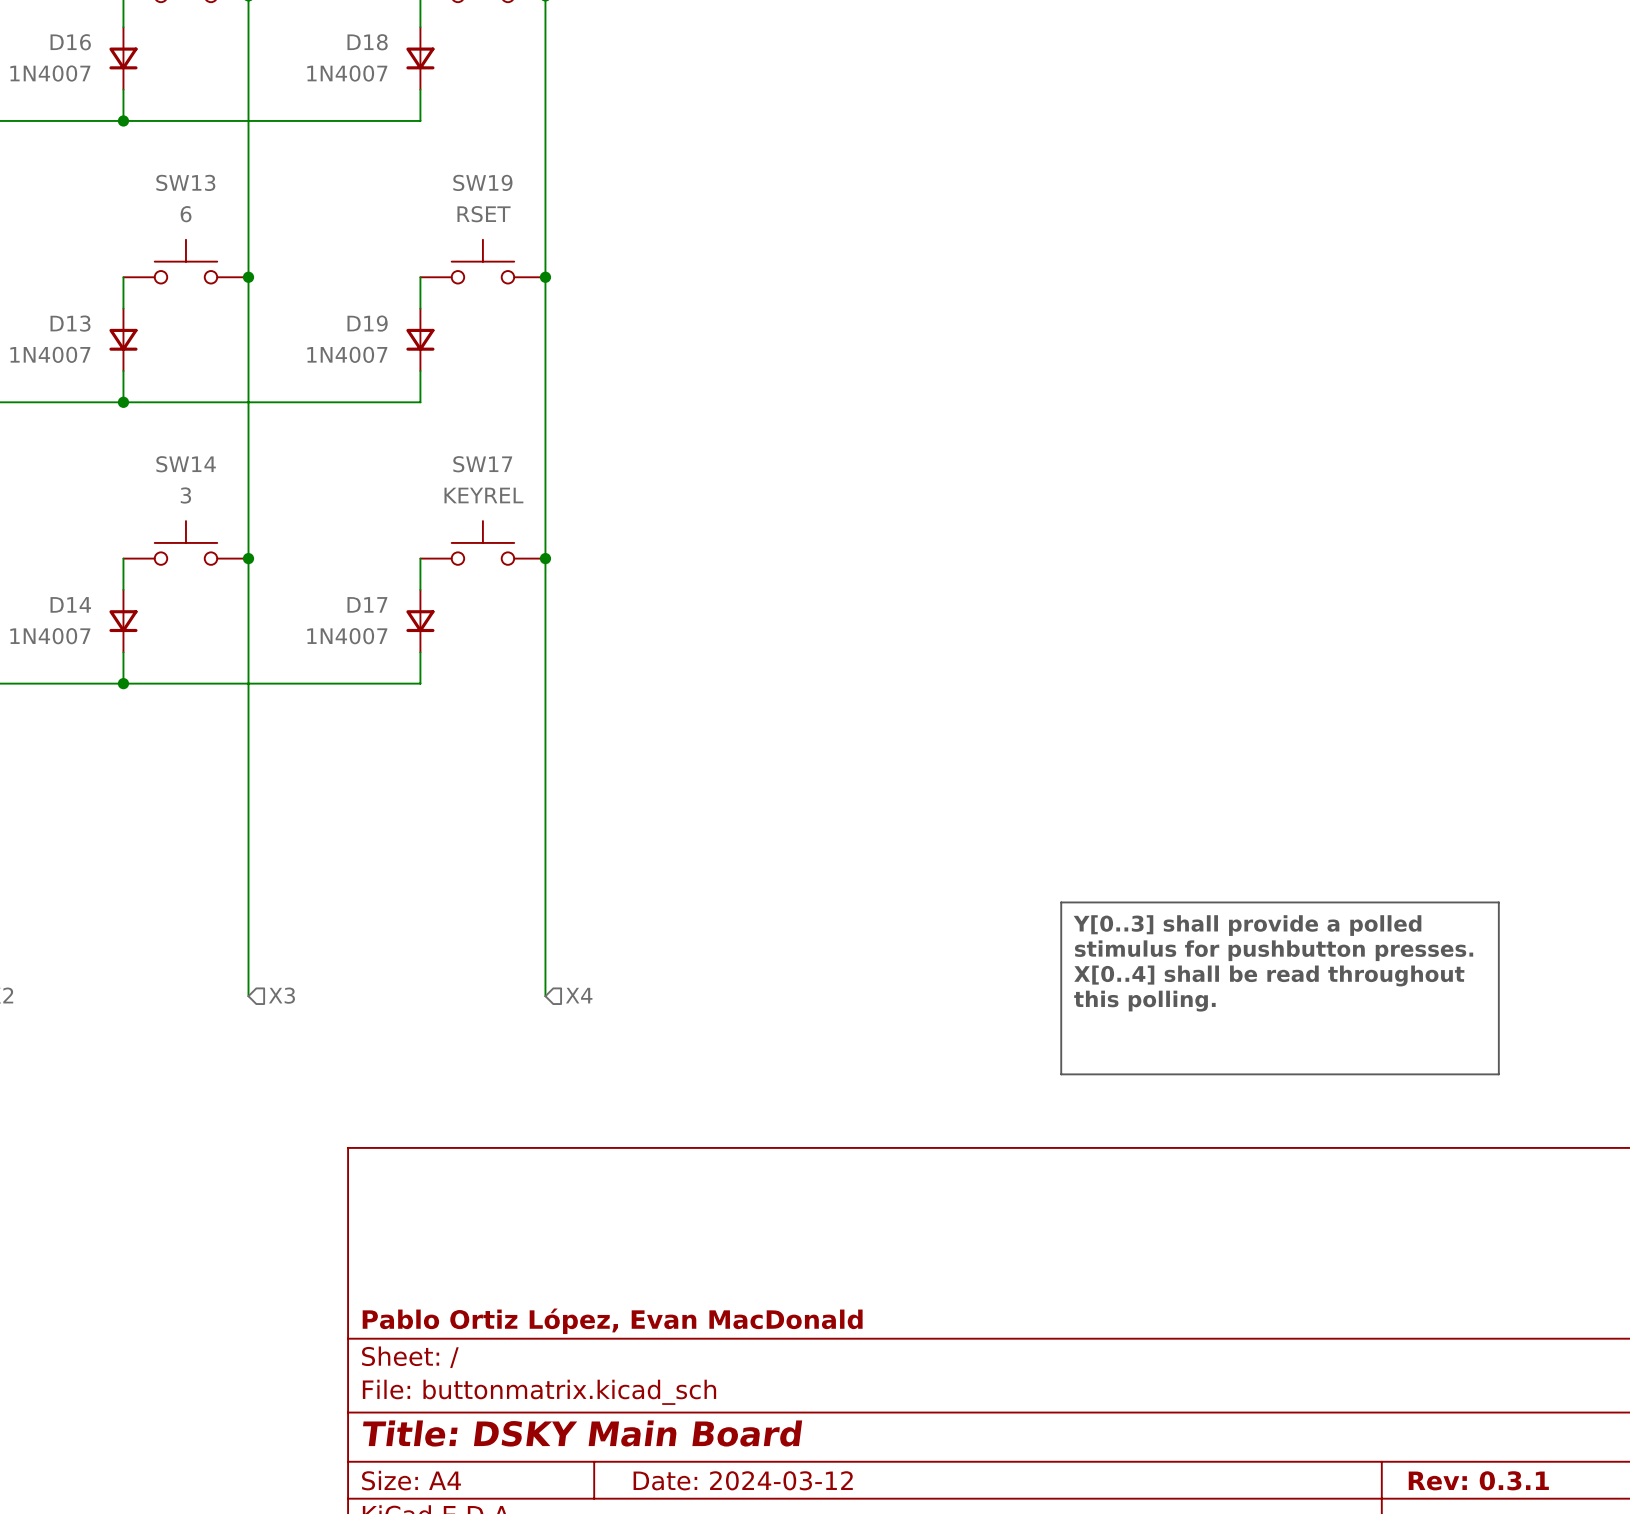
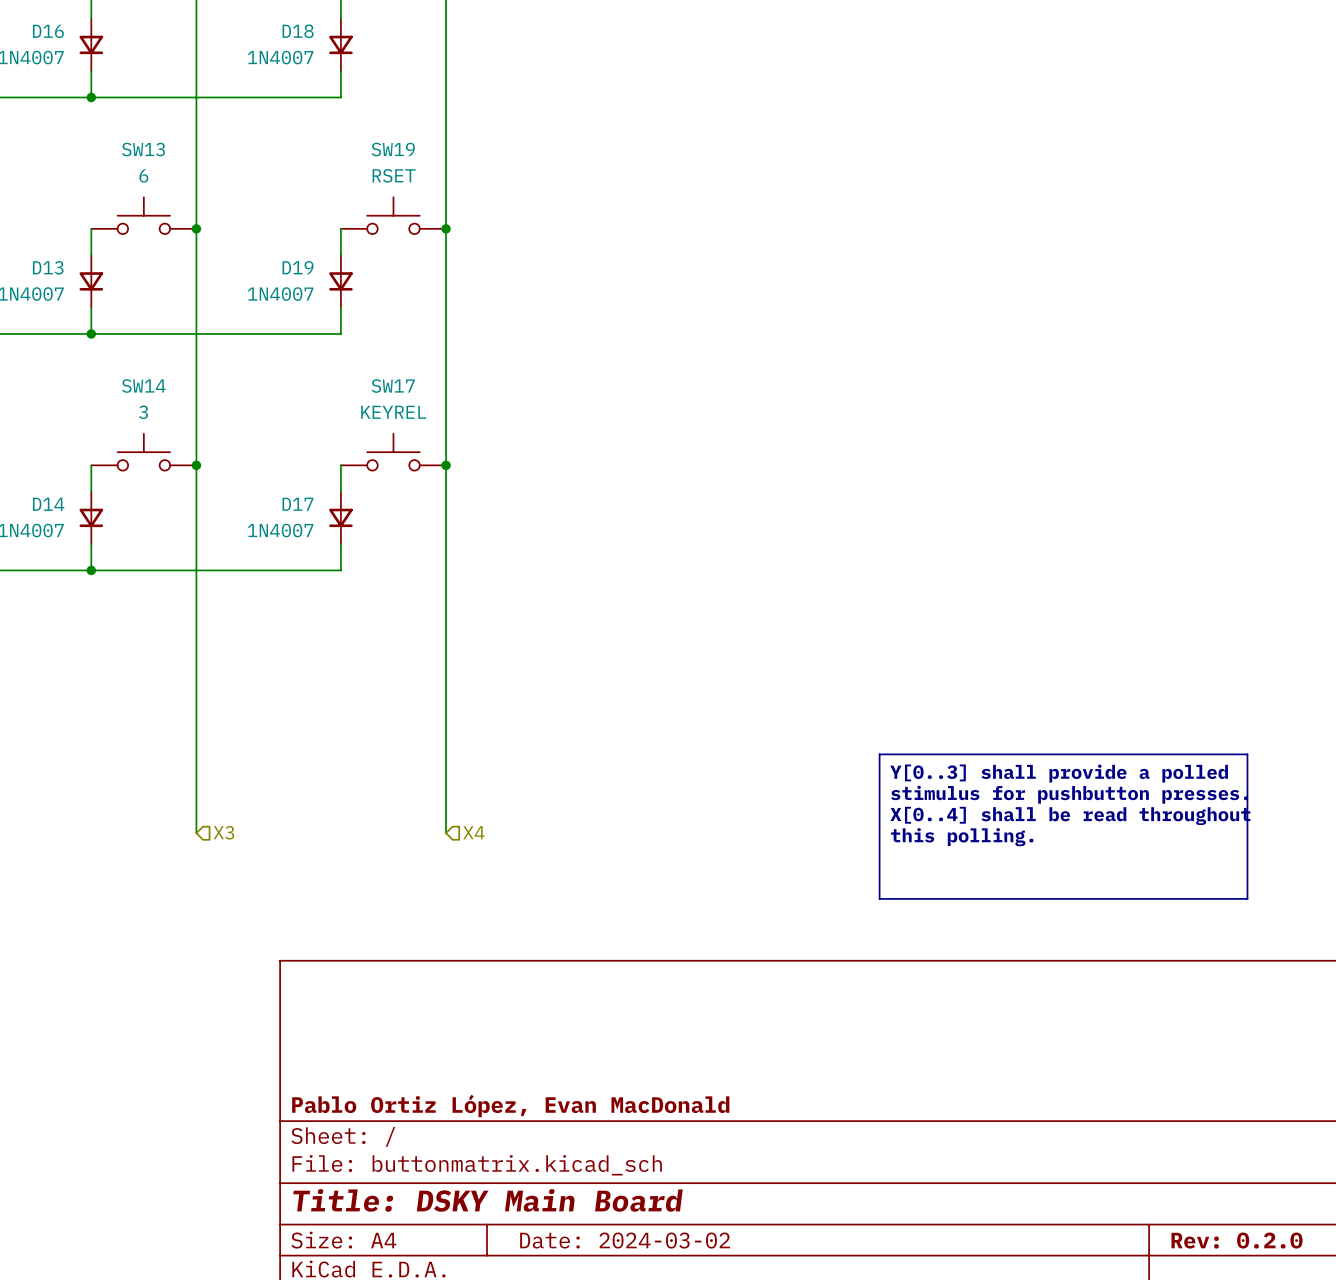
title block: Date: 2024-03-12 (743, 1480) -> Date: 2024-03-02 (625, 1240)
title block: Rev: 0.3.1 (1478, 1480) -> Rev: 0.2.0 (1237, 1240)

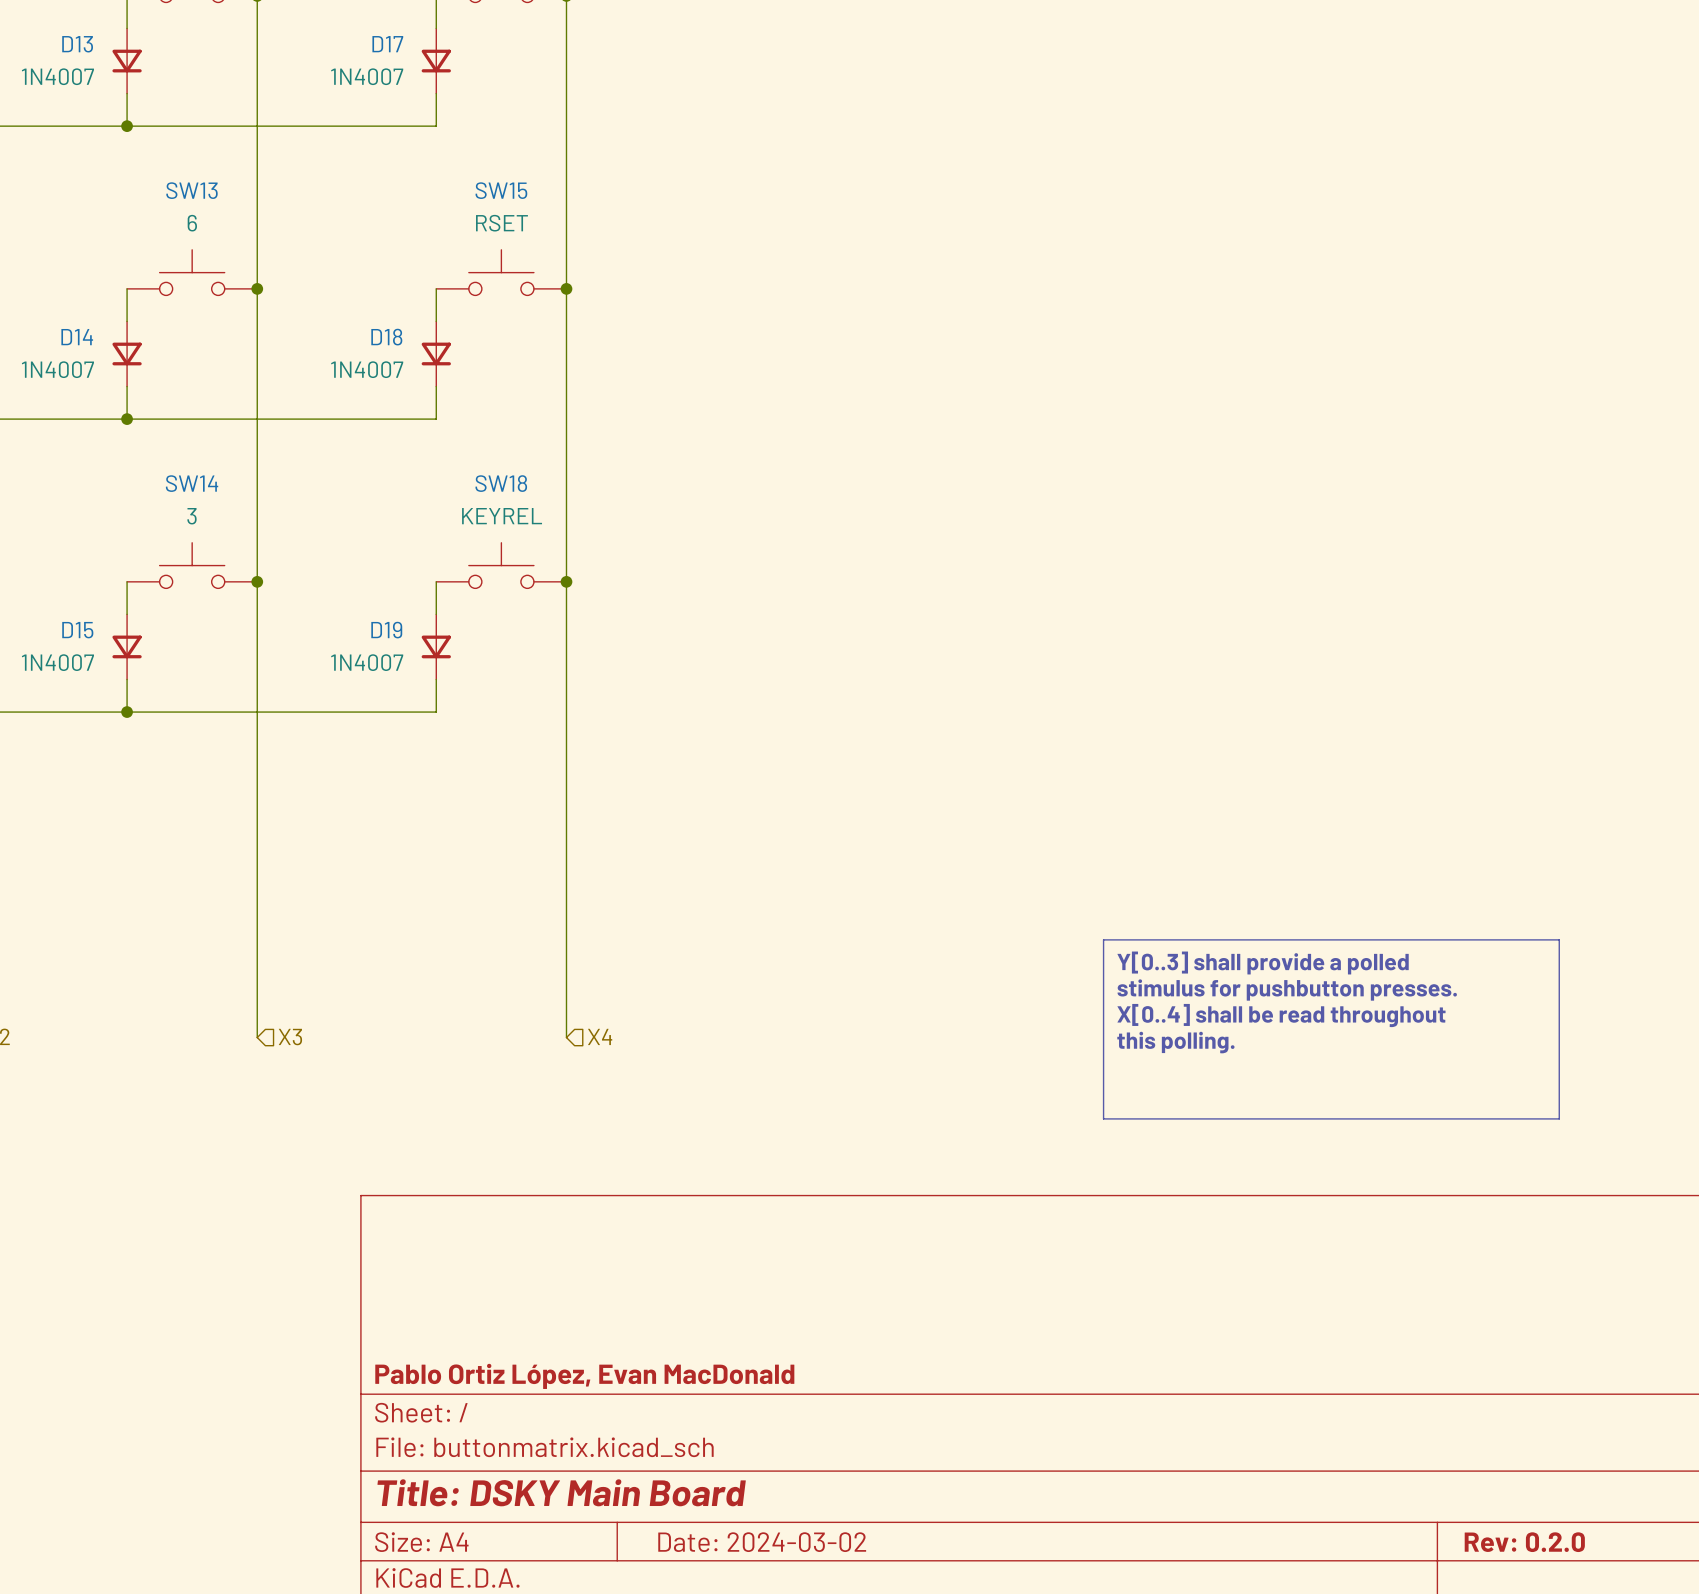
D16 name: D16 (48, 31) -> D13 (77, 44)
D18 name: D18 (298, 31) -> D17 (387, 44)
SW19 name: SW19 (393, 149) -> SW15 (501, 190)
D13 name: D13 (48, 267) -> D14 (77, 337)
D19 name: D19 (298, 267) -> D18 (386, 337)
SW17 name: SW17 (393, 386) -> SW18 (501, 483)
D14 name: D14 (48, 504) -> D15 (77, 630)
D17 name: D17 (297, 504) -> D19 (386, 630)

